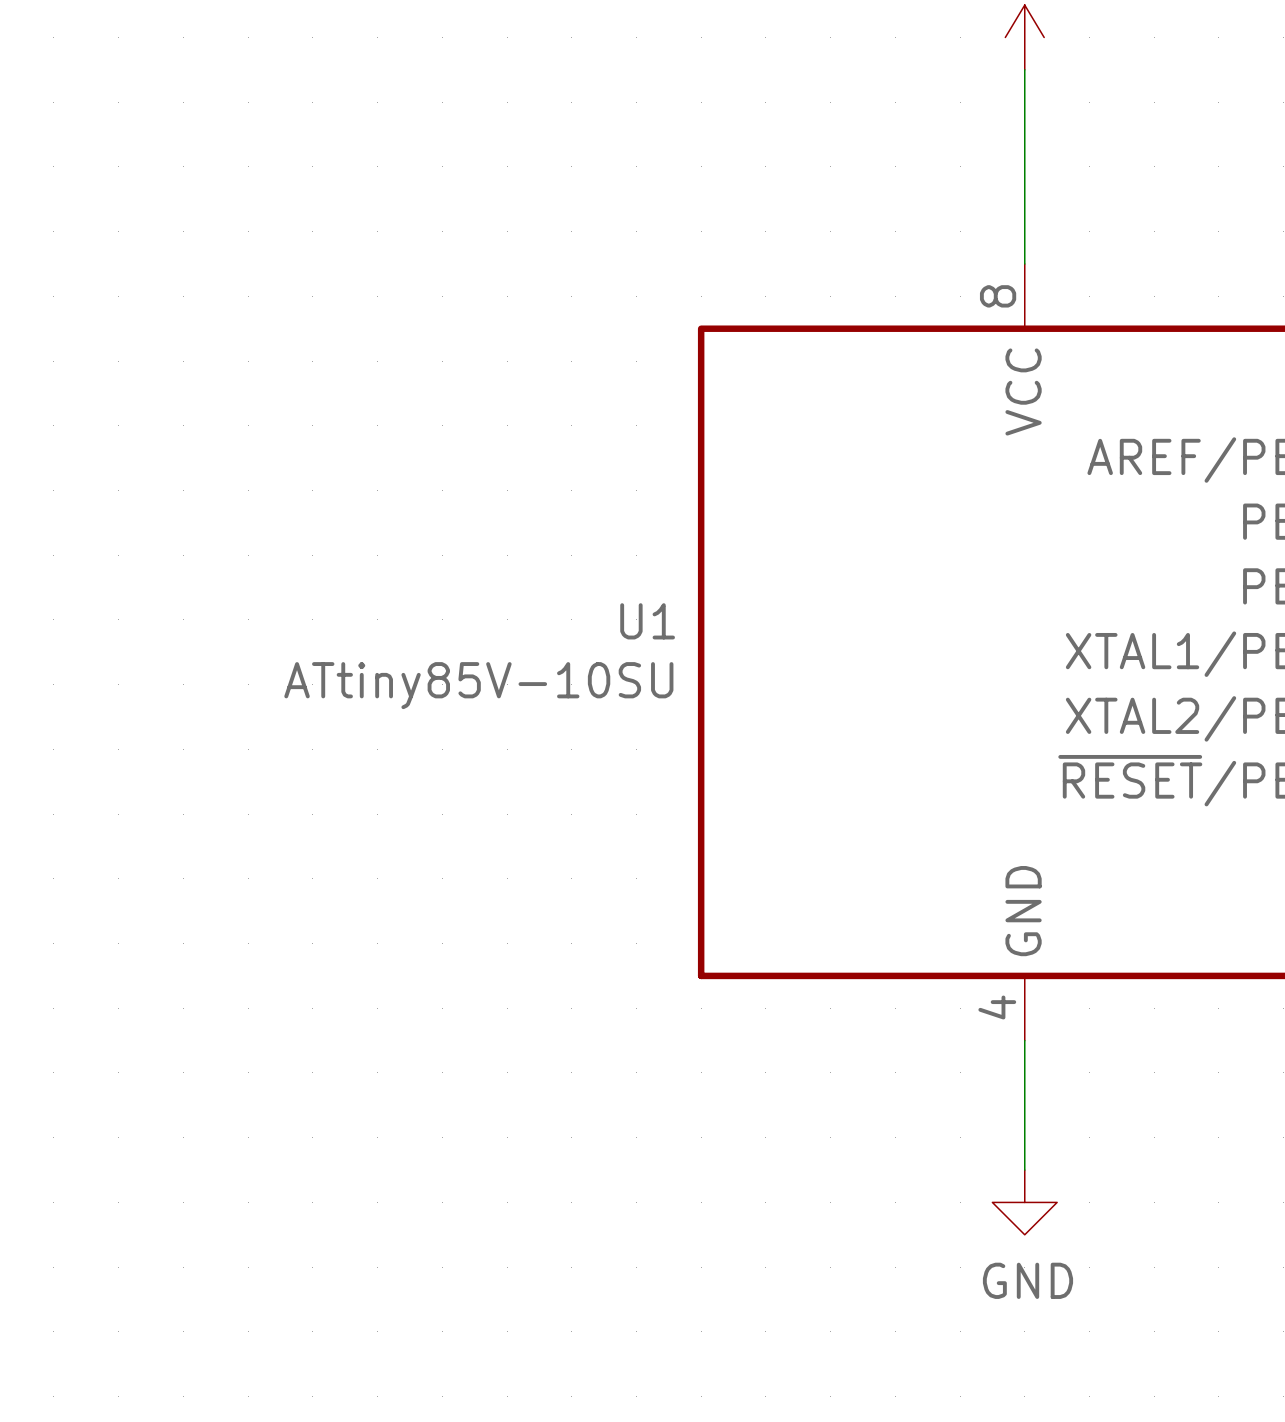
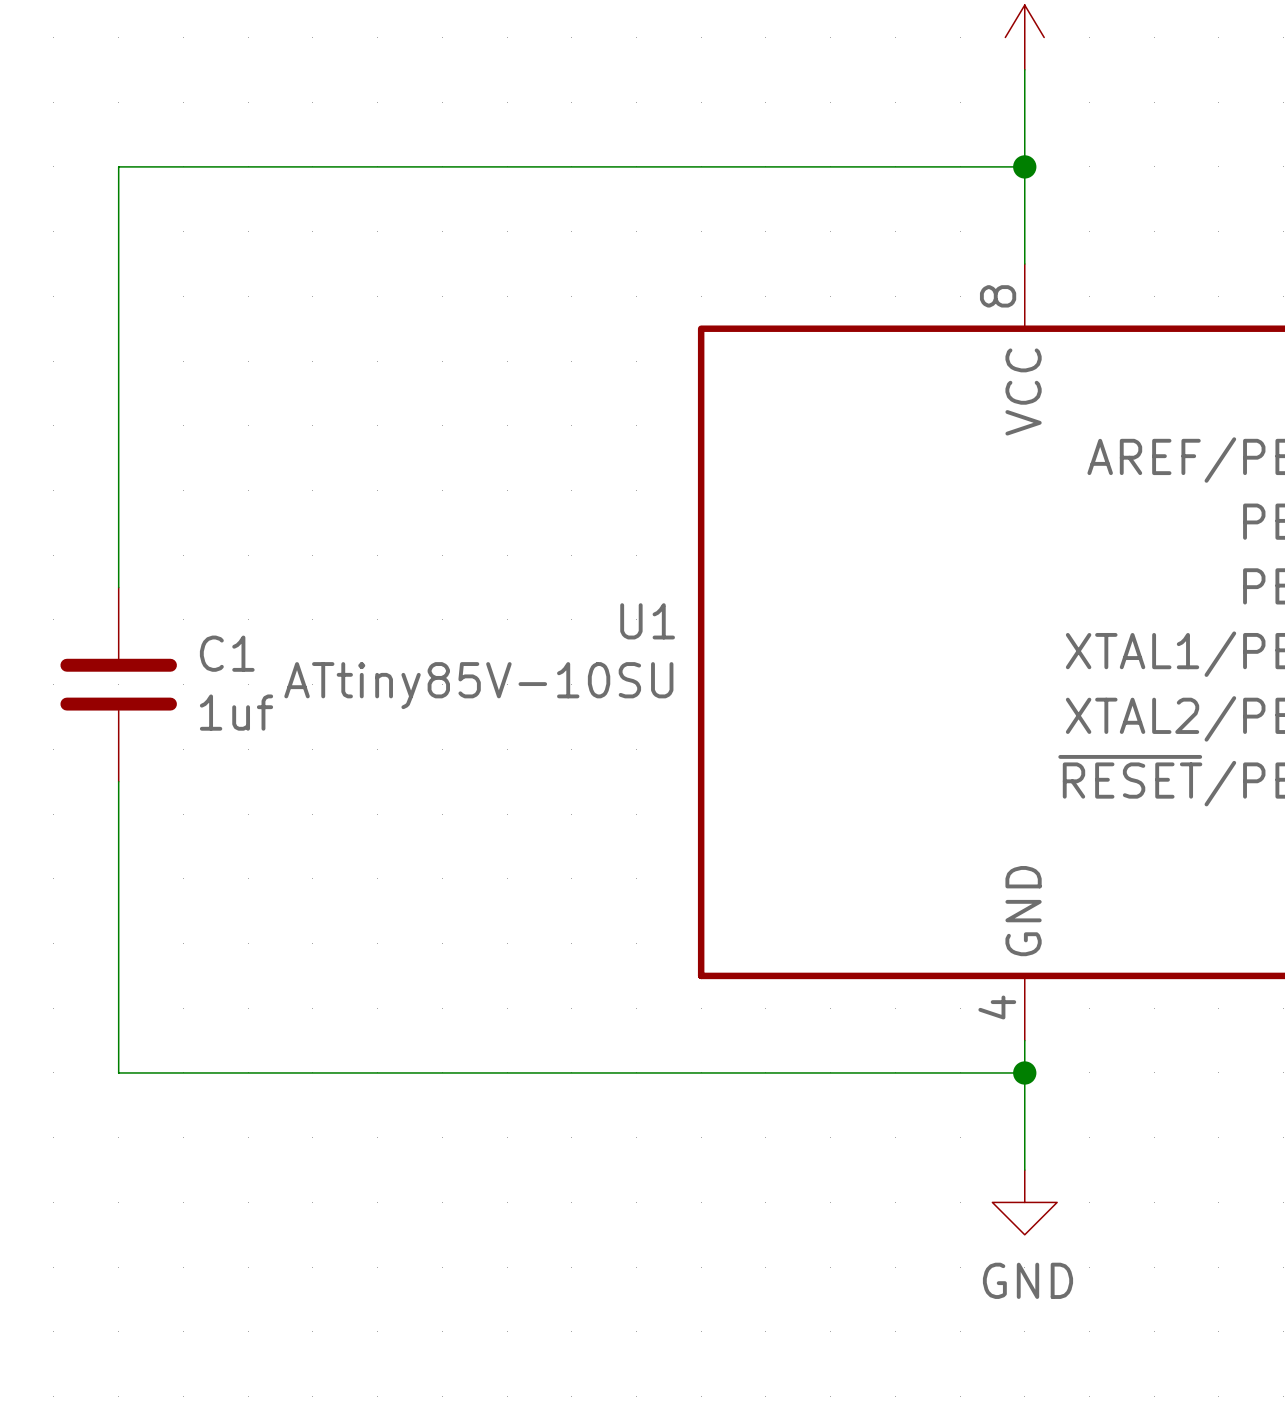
wire: none -> (1024, 166) (118, 166) (118, 587)
junction: none -> (1024, 166)
C1: none -> 1uf (118, 684)
wire: none -> (118, 781) (118, 1072) (1024, 1072)
junction: none -> (1024, 1072)

